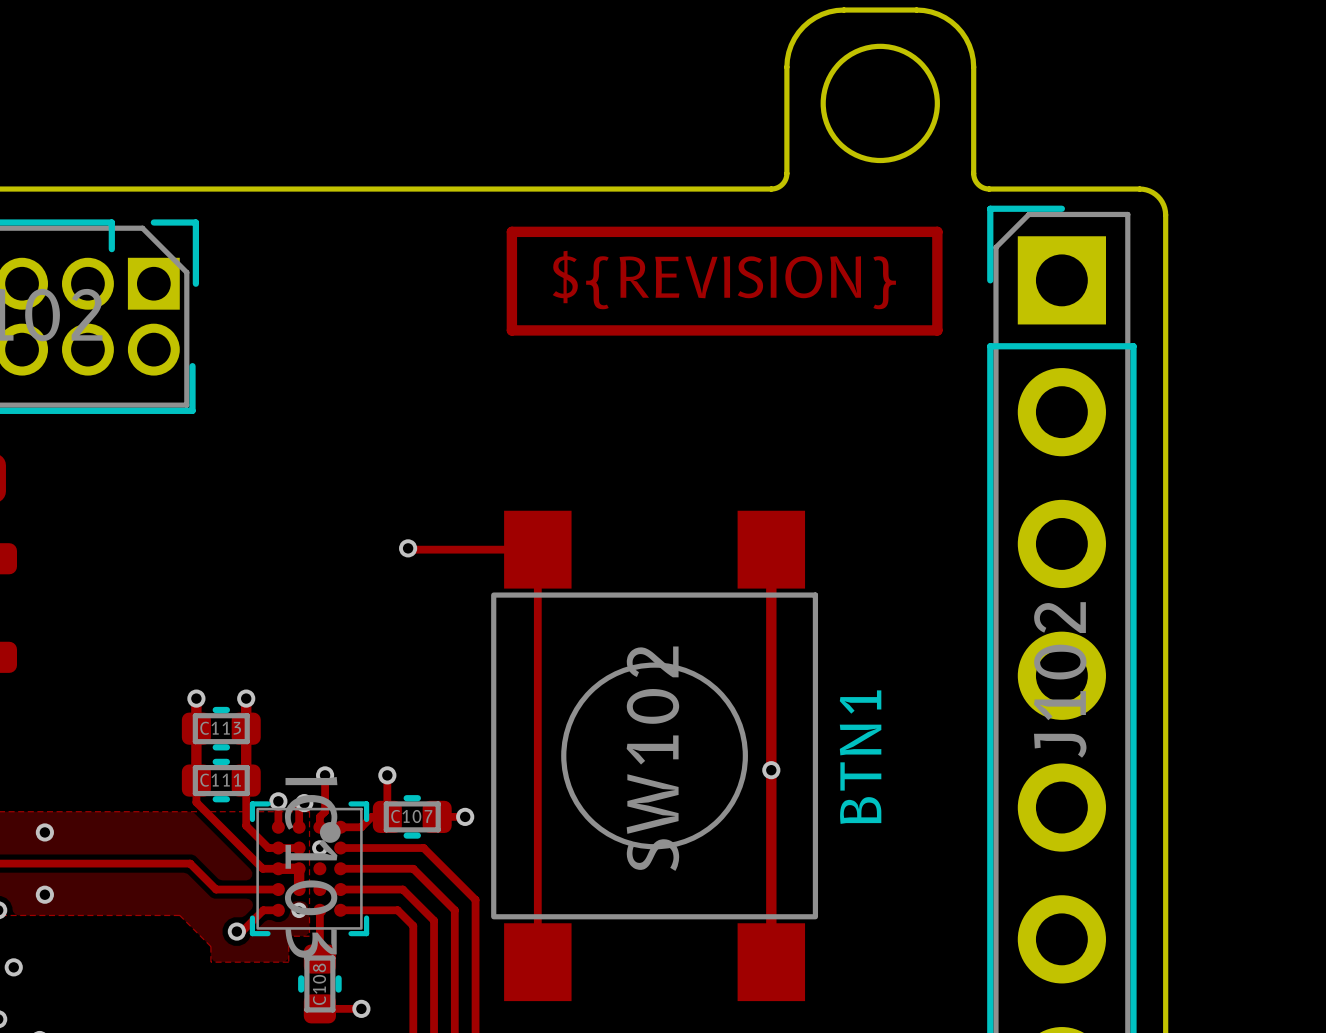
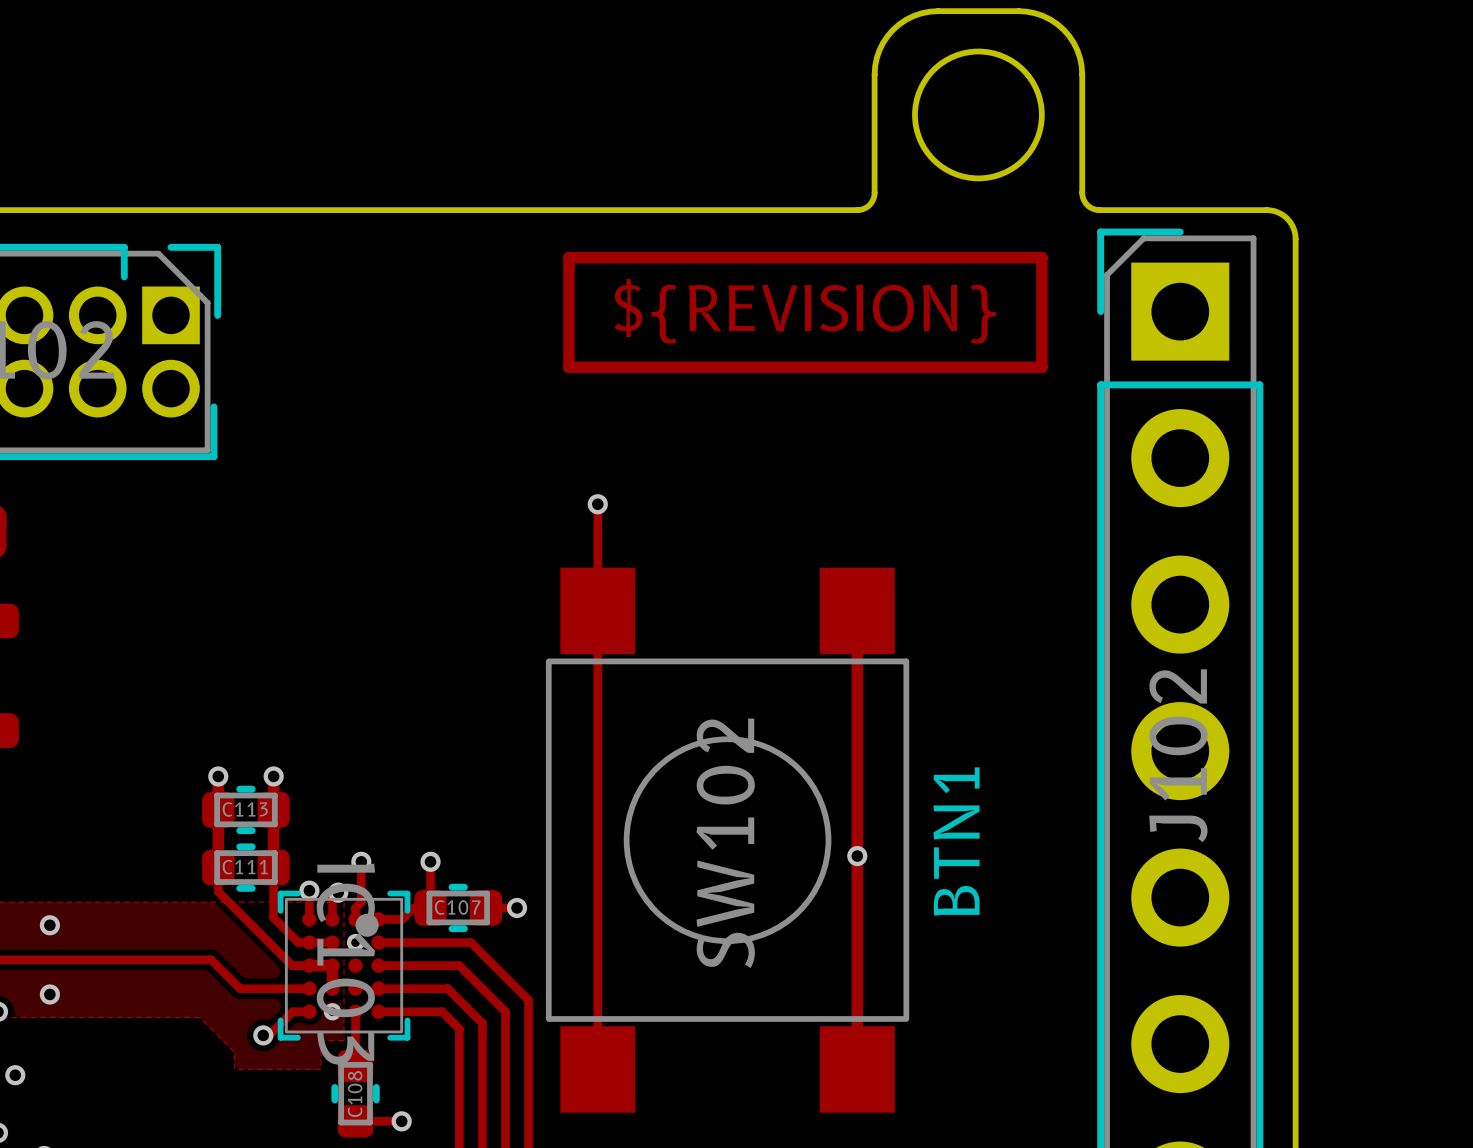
track: (408, 548) (537, 549) -> (597, 504) (597, 610)
via position: (408, 548) -> (597, 504)

